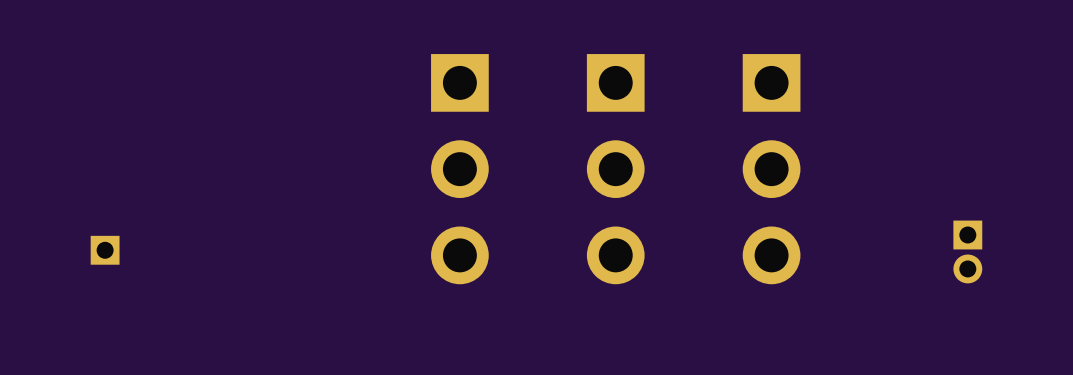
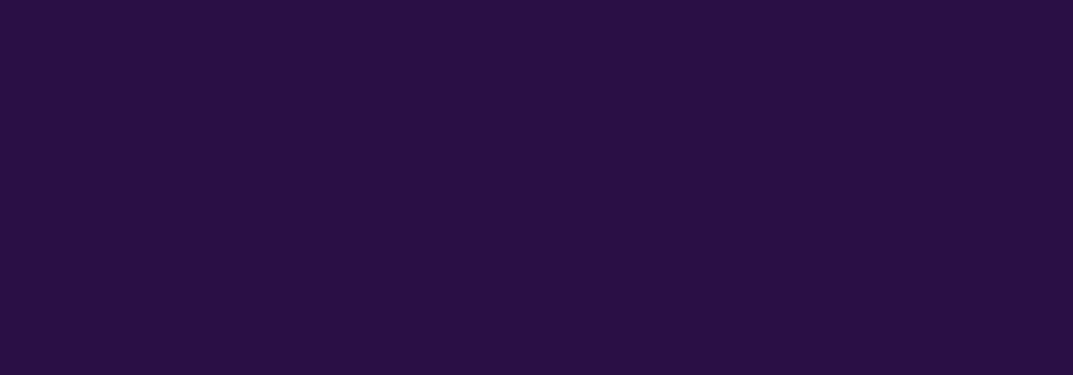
part: (459, 169) -> none
part: (615, 169) -> none
part: (771, 169) -> none
part: (105, 250) -> none
part: (967, 251) -> none

